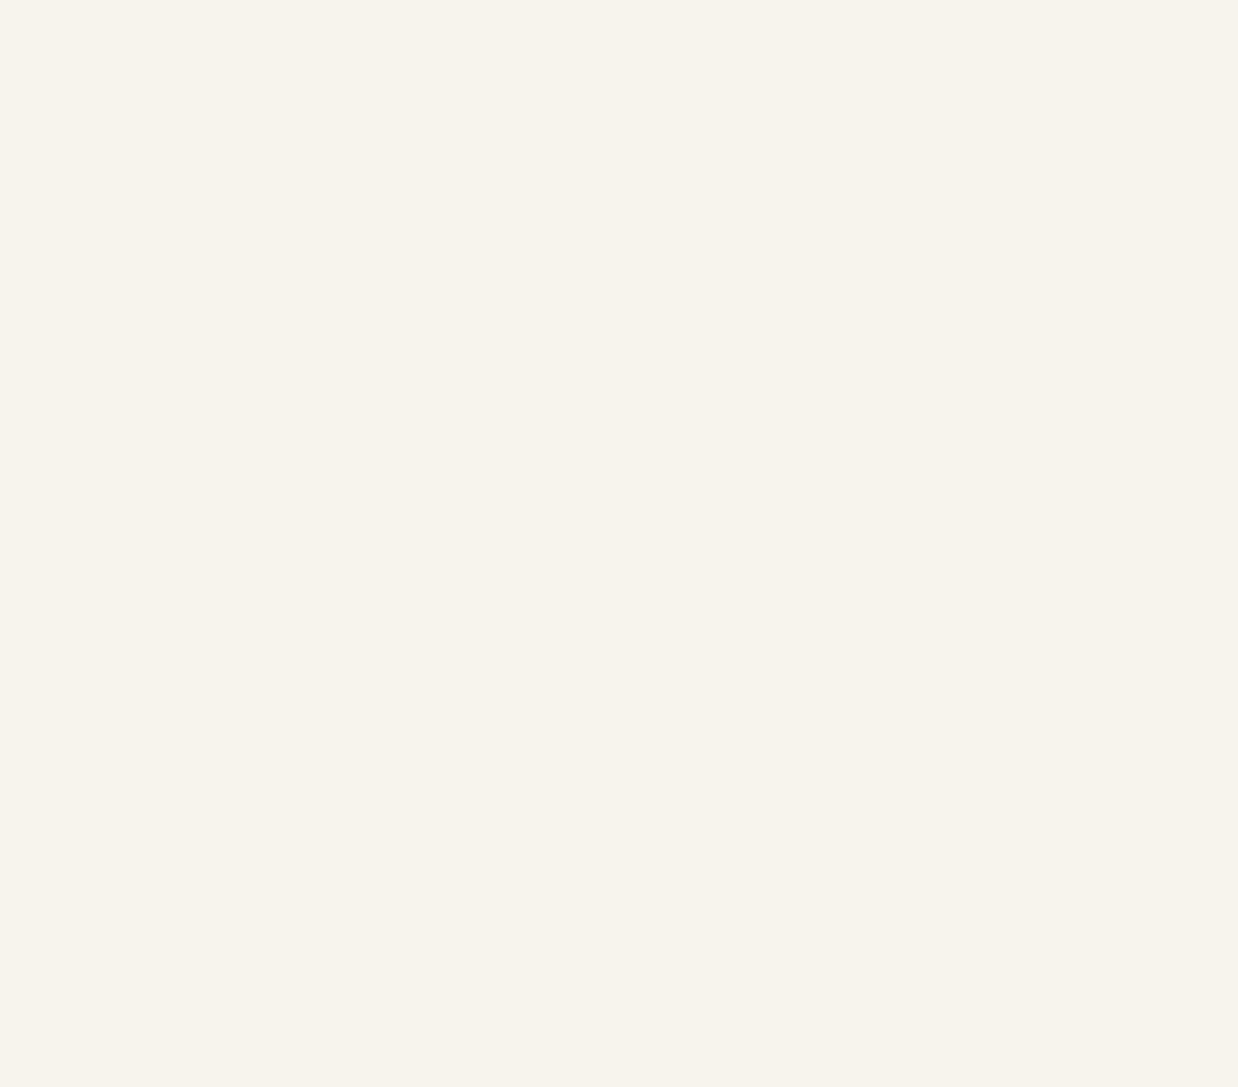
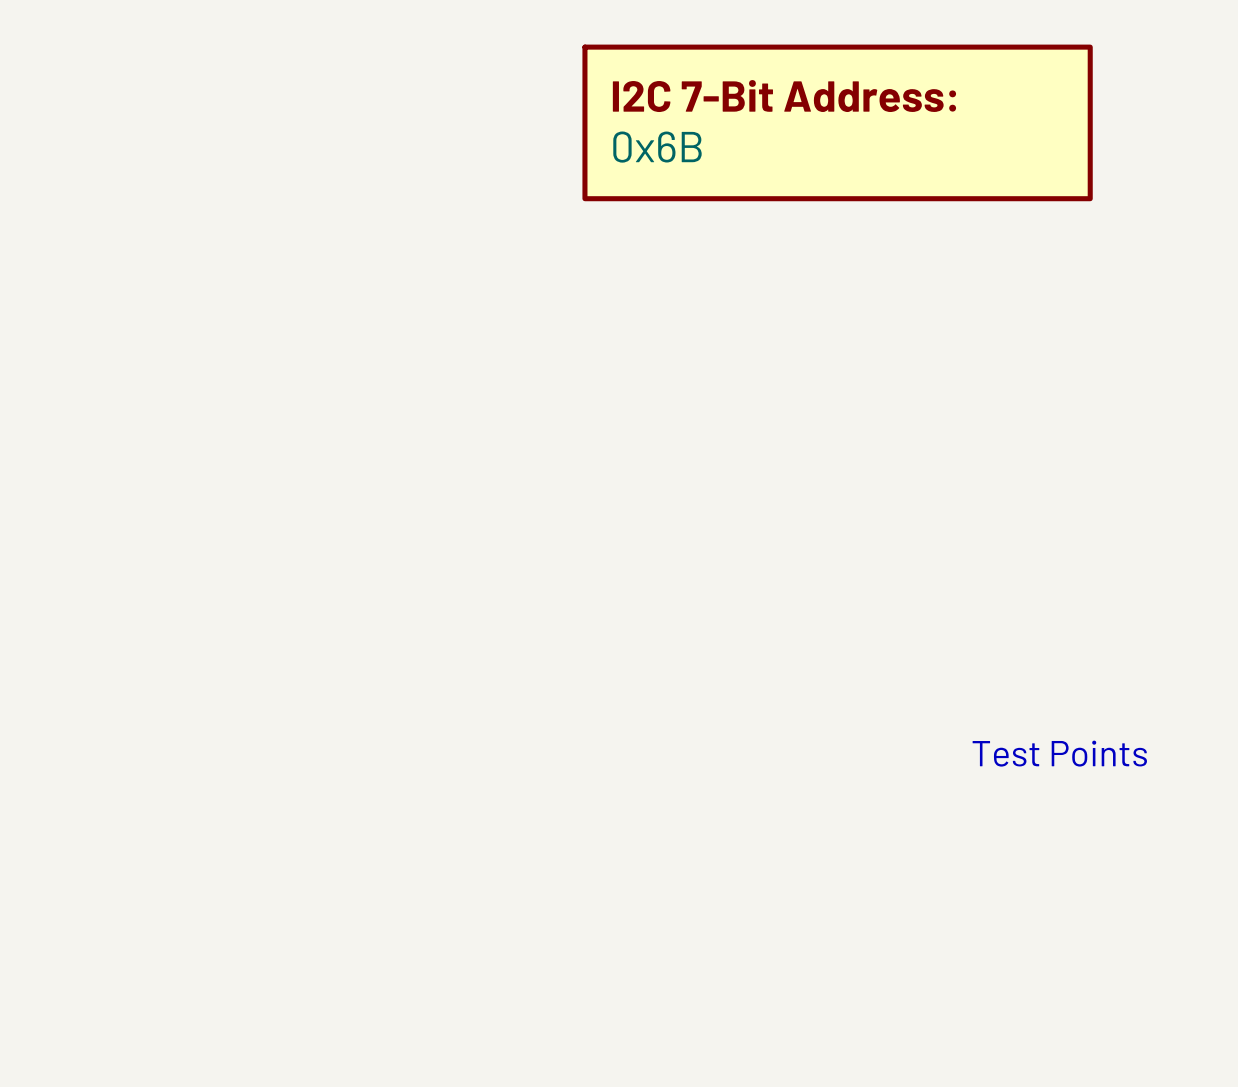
part: none -> 0x6B (837, 122)
text: none -> Test Points (1059, 753)

